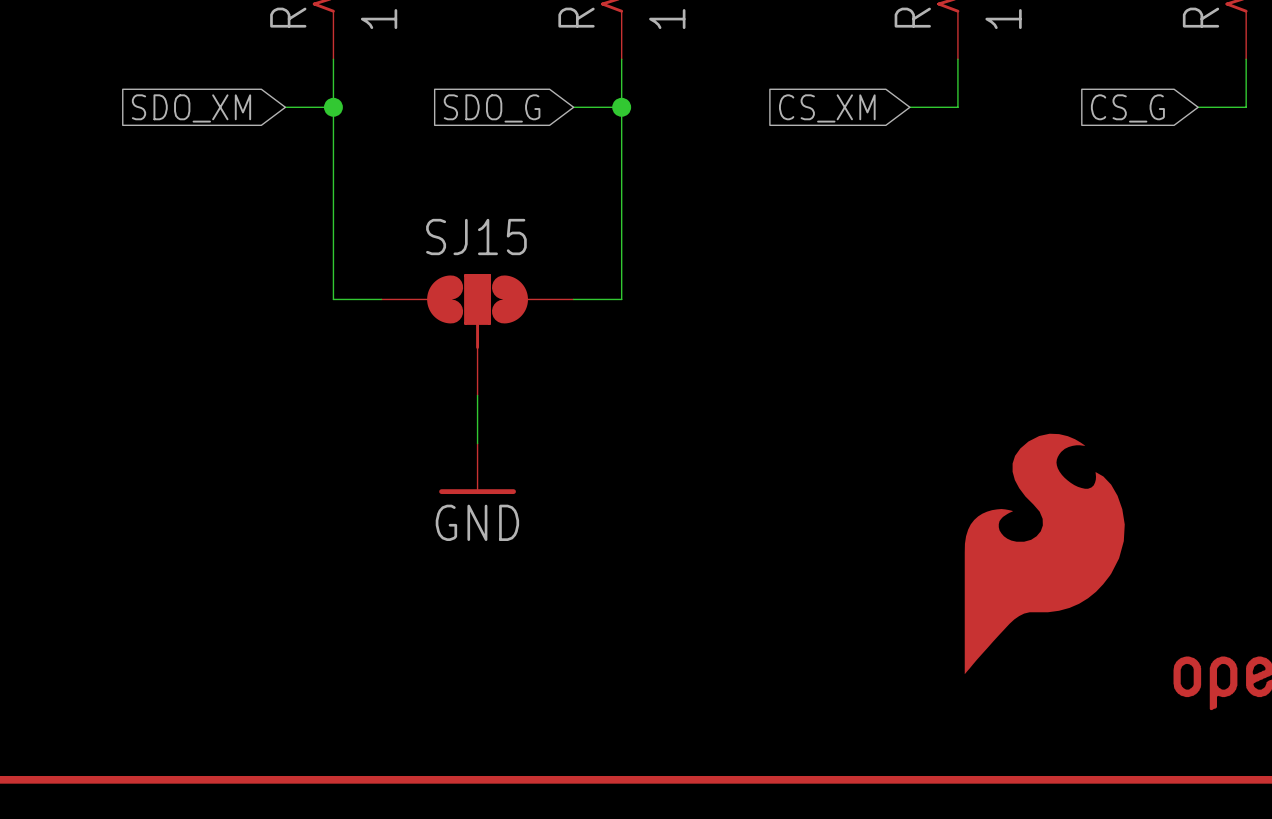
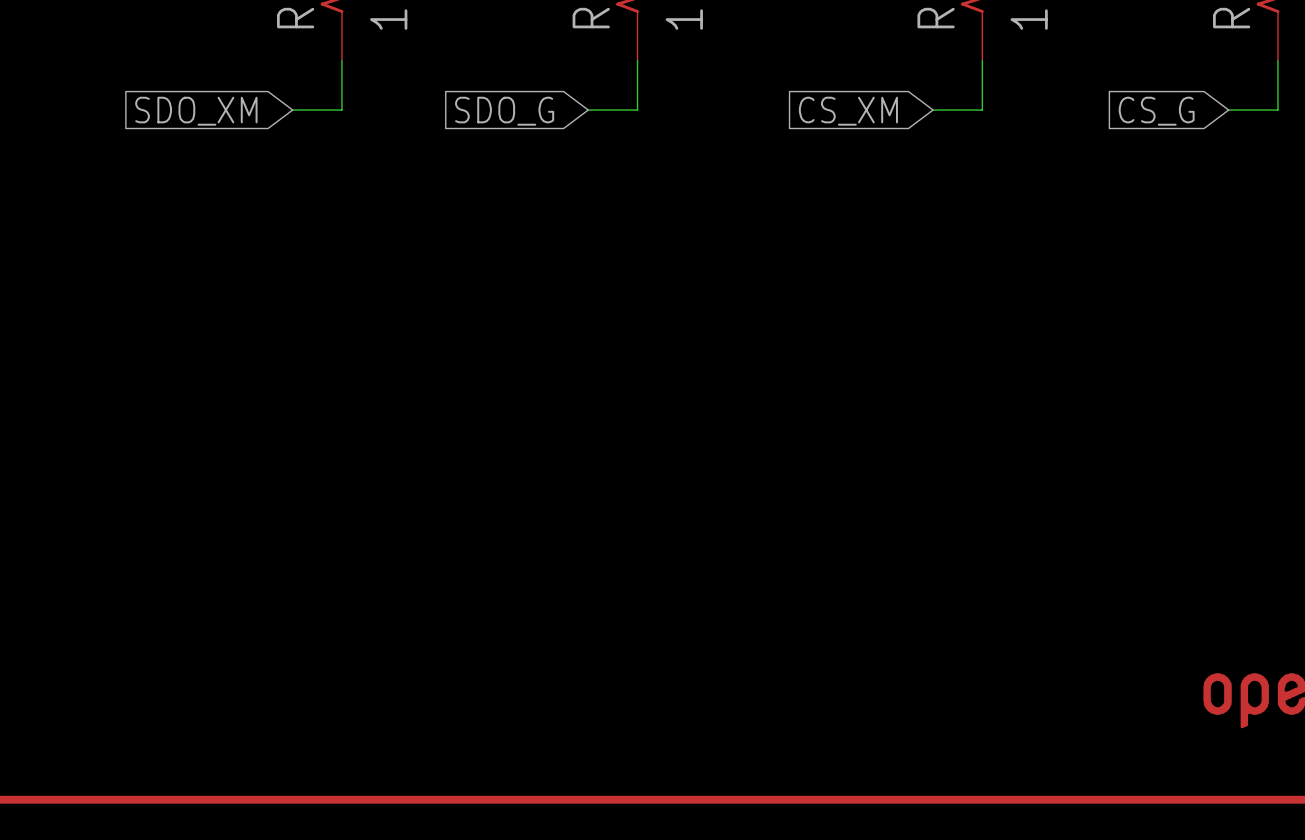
wire: (333, 107) (333, 299) (381, 299) -> none
junction: (333, 107) -> none
wire: (621, 107) (621, 299) (573, 299) -> none
junction: (621, 107) -> none
SJ15: (477, 334) -> none
wire: (477, 395) (477, 443) -> none
power symbol: GND (477, 468) -> none
part: (1044, 553) -> none

